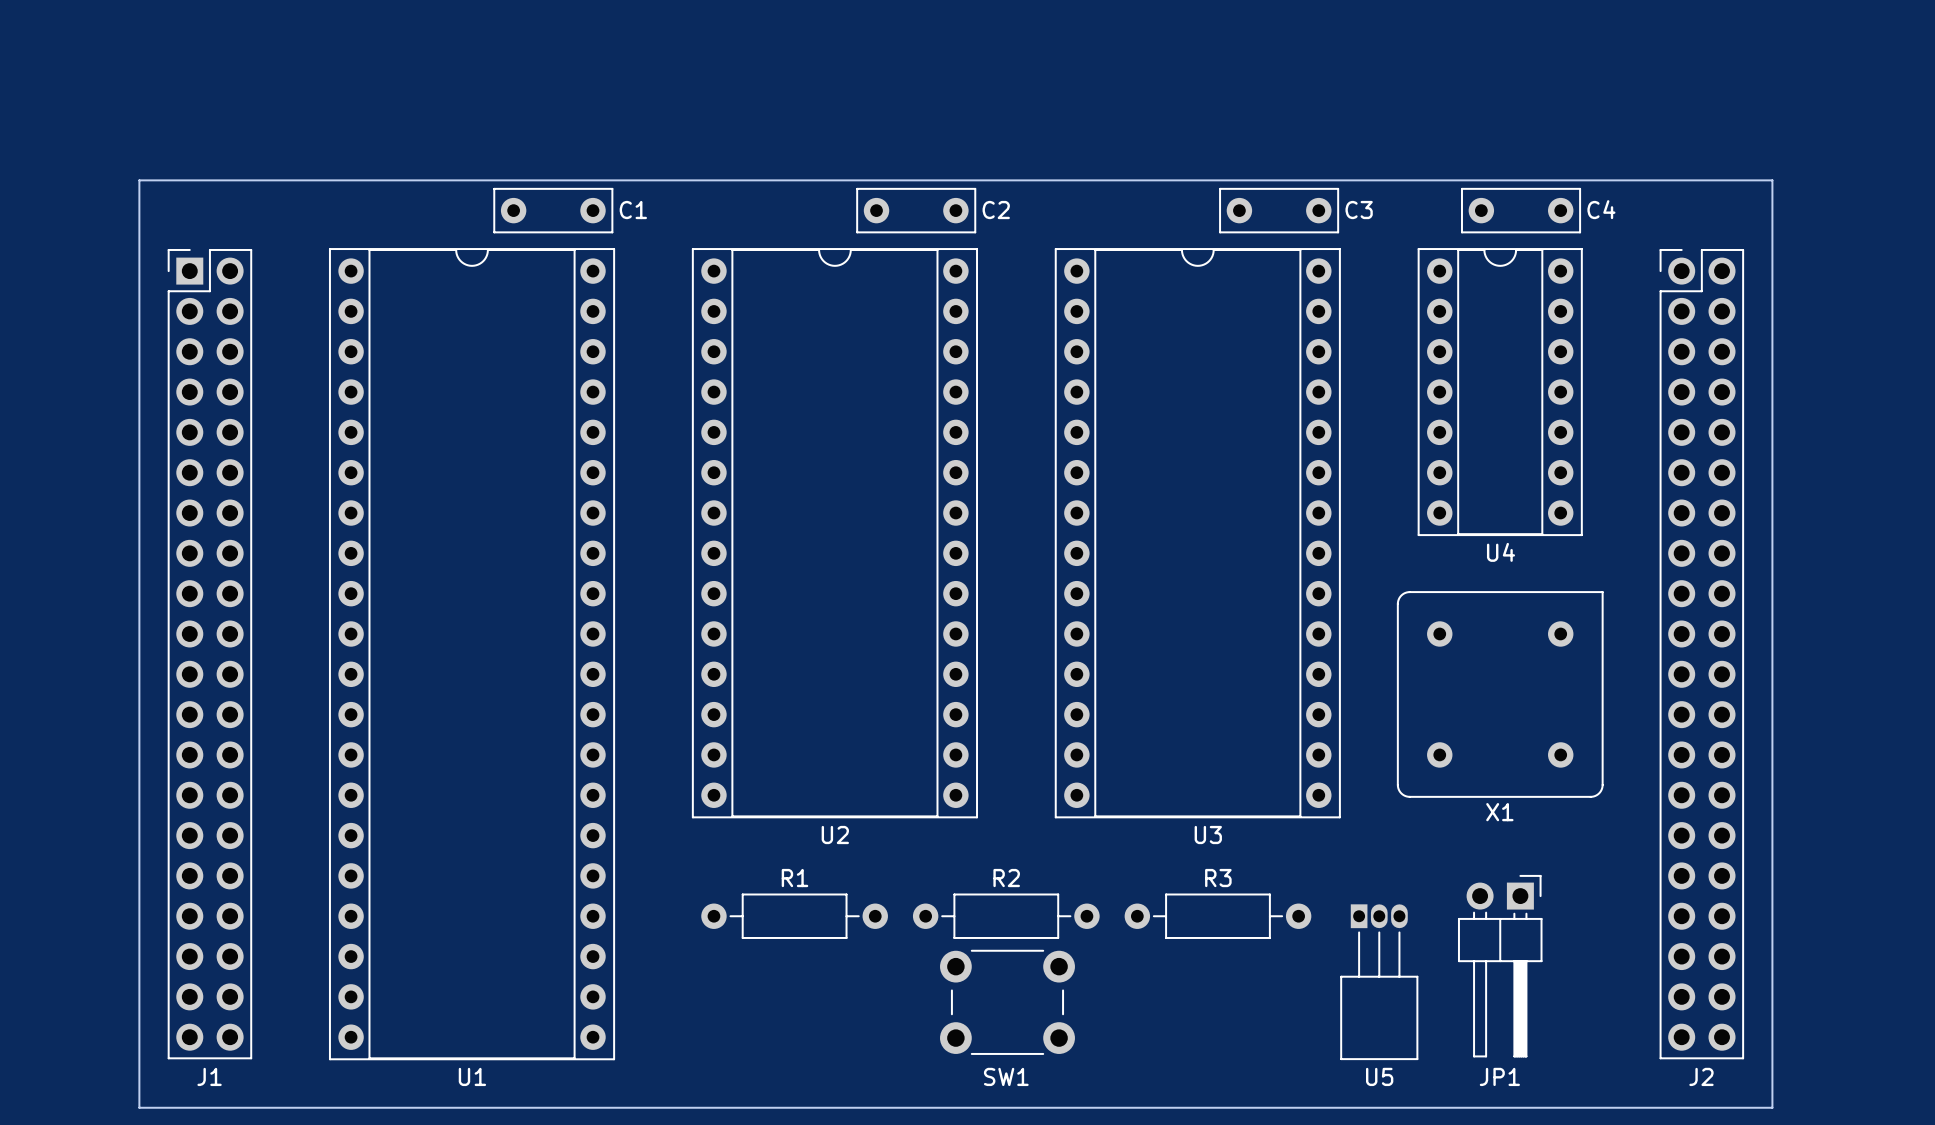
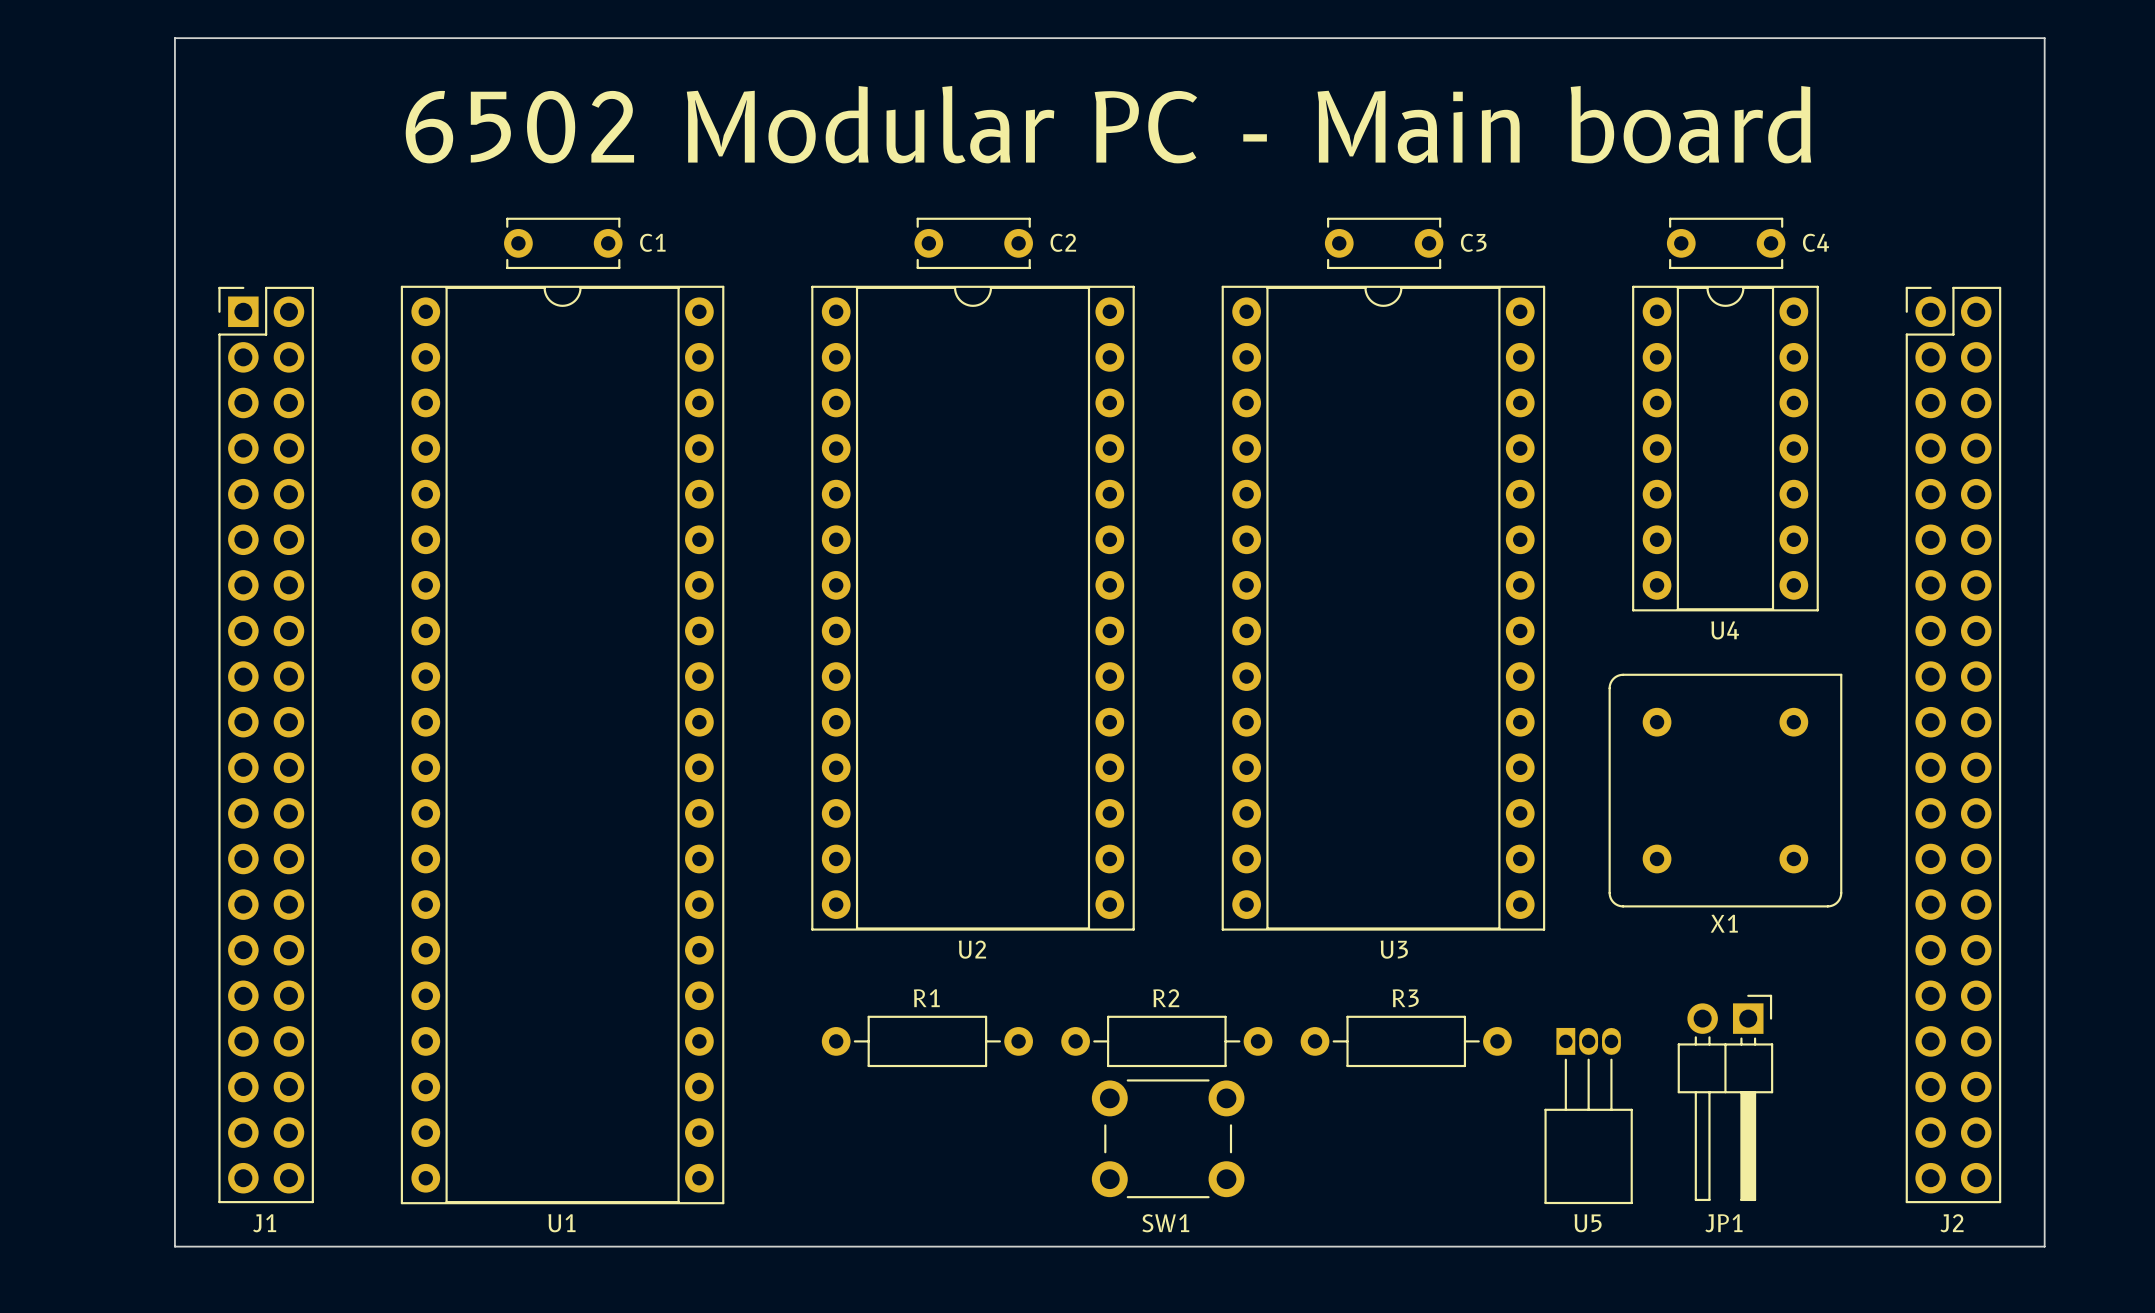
text: none -> 6502 Modular PC - Main board (1108, 124)
board edge: (139, 180) (139, 1107) (1772, 1107) (1772, 180) (139, 180) -> (174, 38) (174, 1246) (2044, 1246) (2044, 38) (174, 38)
C1 footprint: [493, 187, 614, 234] -> [504, 217, 623, 270]
C2 footprint: [856, 187, 977, 234] -> [914, 217, 1033, 270]
C3 footprint: [1219, 187, 1340, 234] -> [1324, 217, 1444, 270]
C4 footprint: [1461, 187, 1582, 234] -> [1666, 217, 1786, 270]

